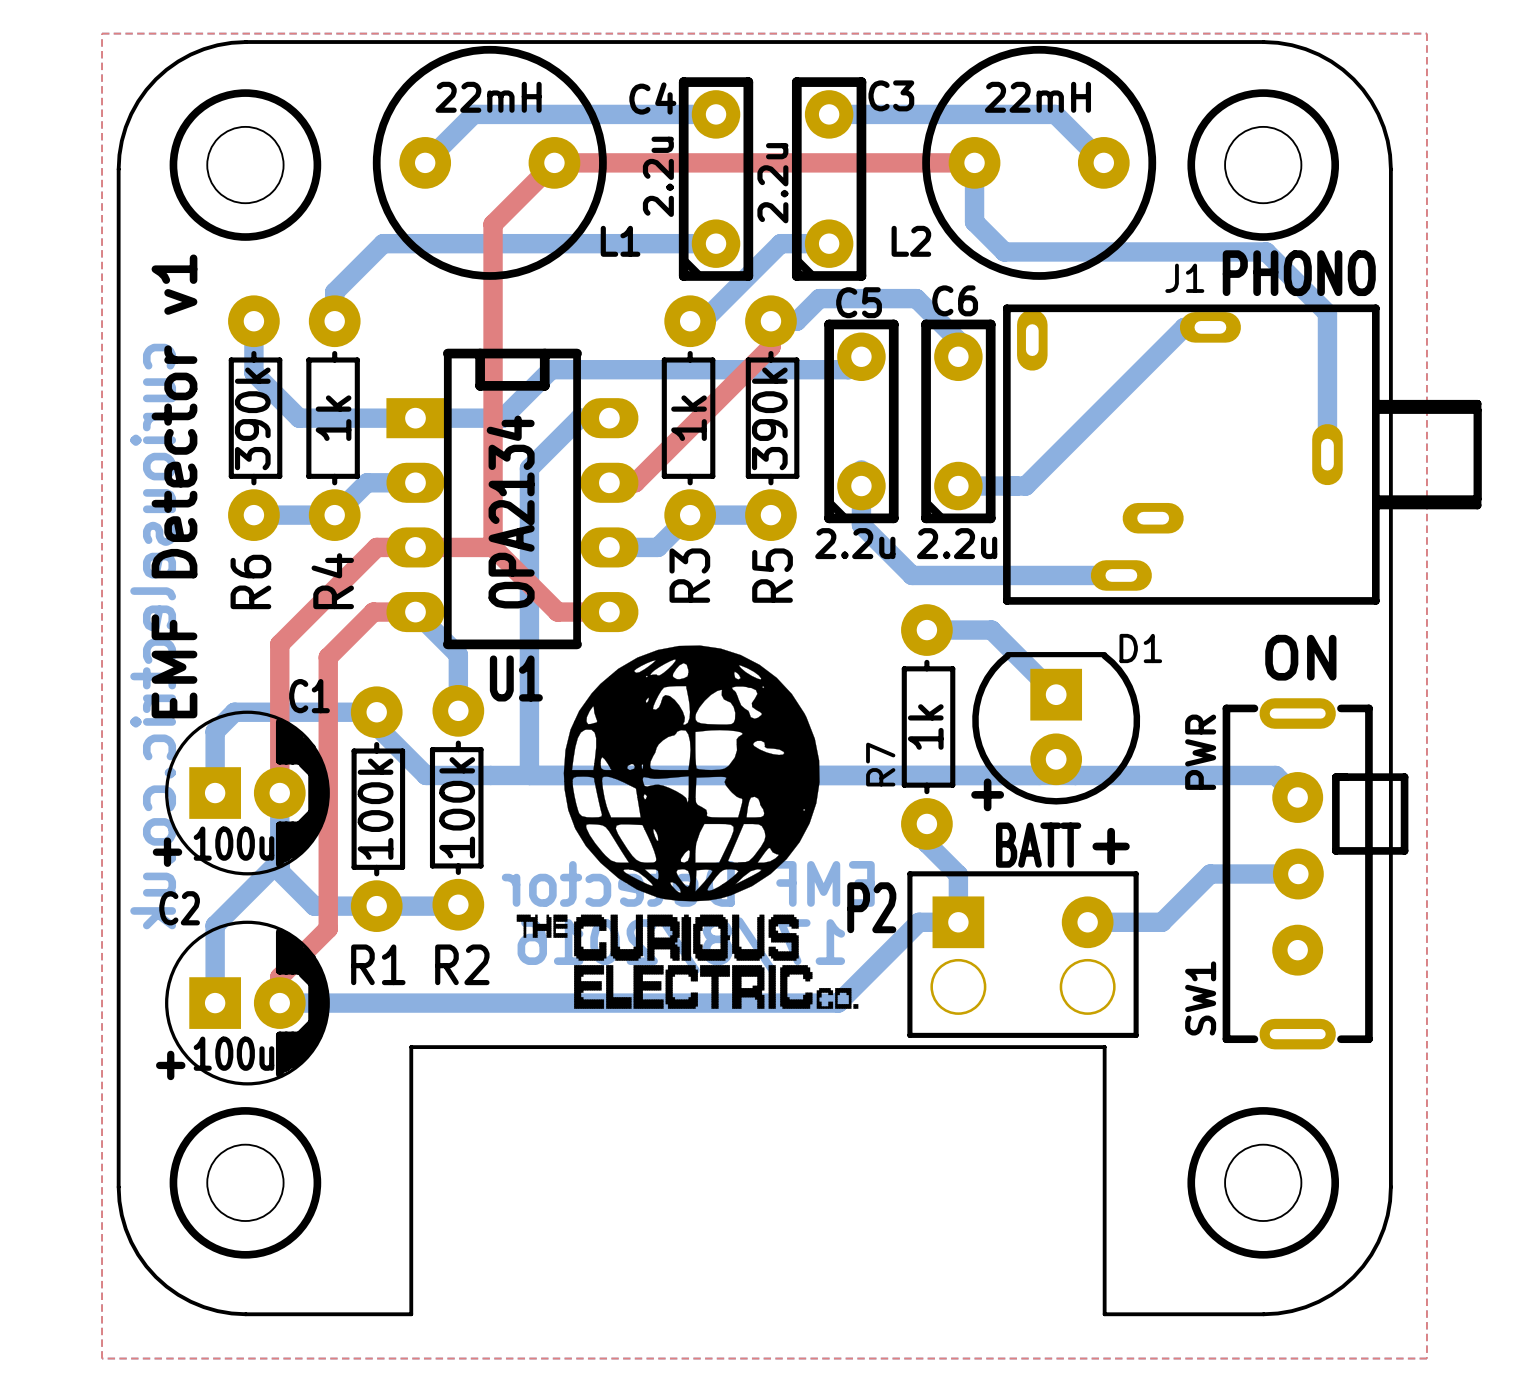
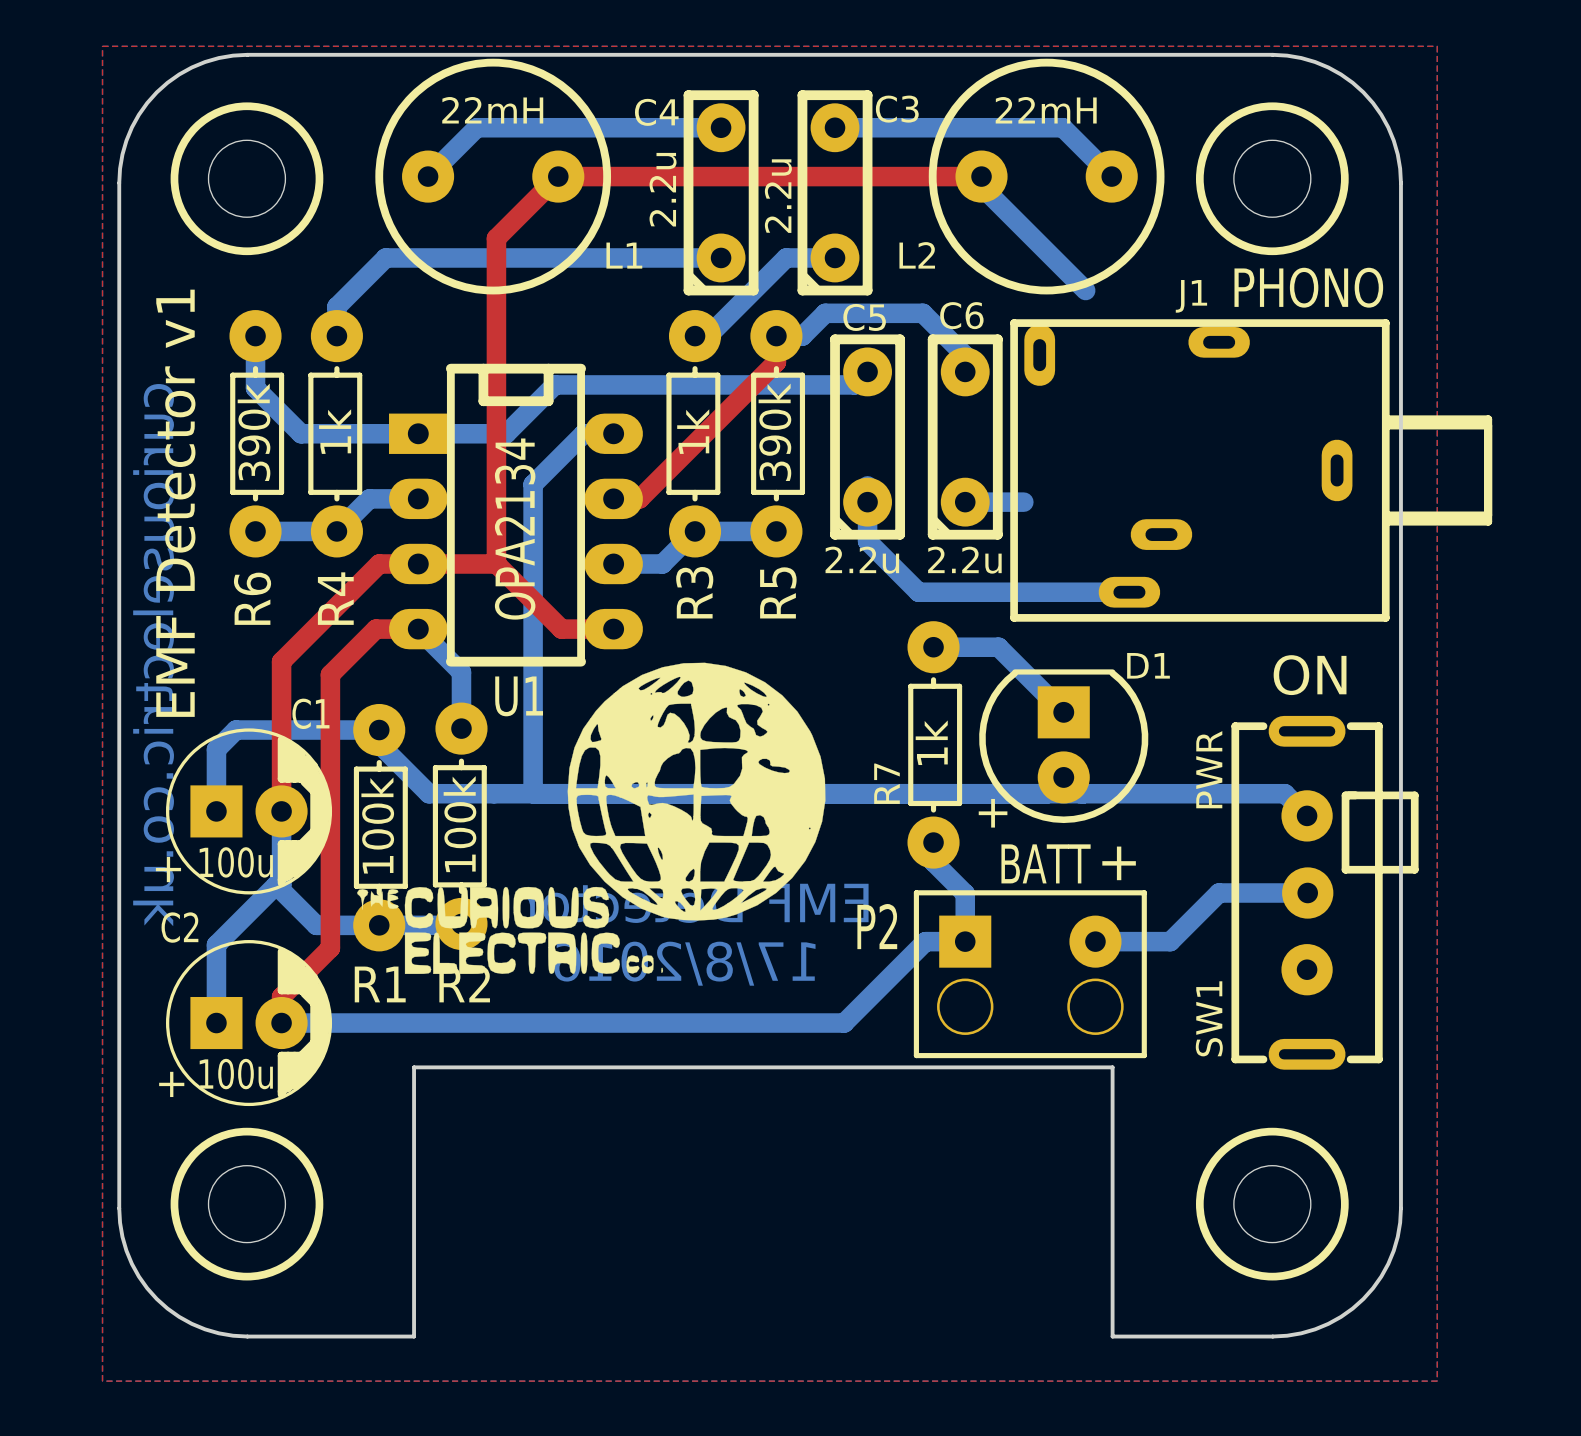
bottom track: (974, 172) (974, 222) (1004, 251) (1266, 251) (1327, 313) (1327, 454) -> (981, 186) (1085, 290)
bottom track: (1210, 327) (1184, 327) (1025, 486) (1016, 486) -> none
drawing: none -> [357, 886, 664, 975]
drawing: [516, 914, 859, 1009] -> none

